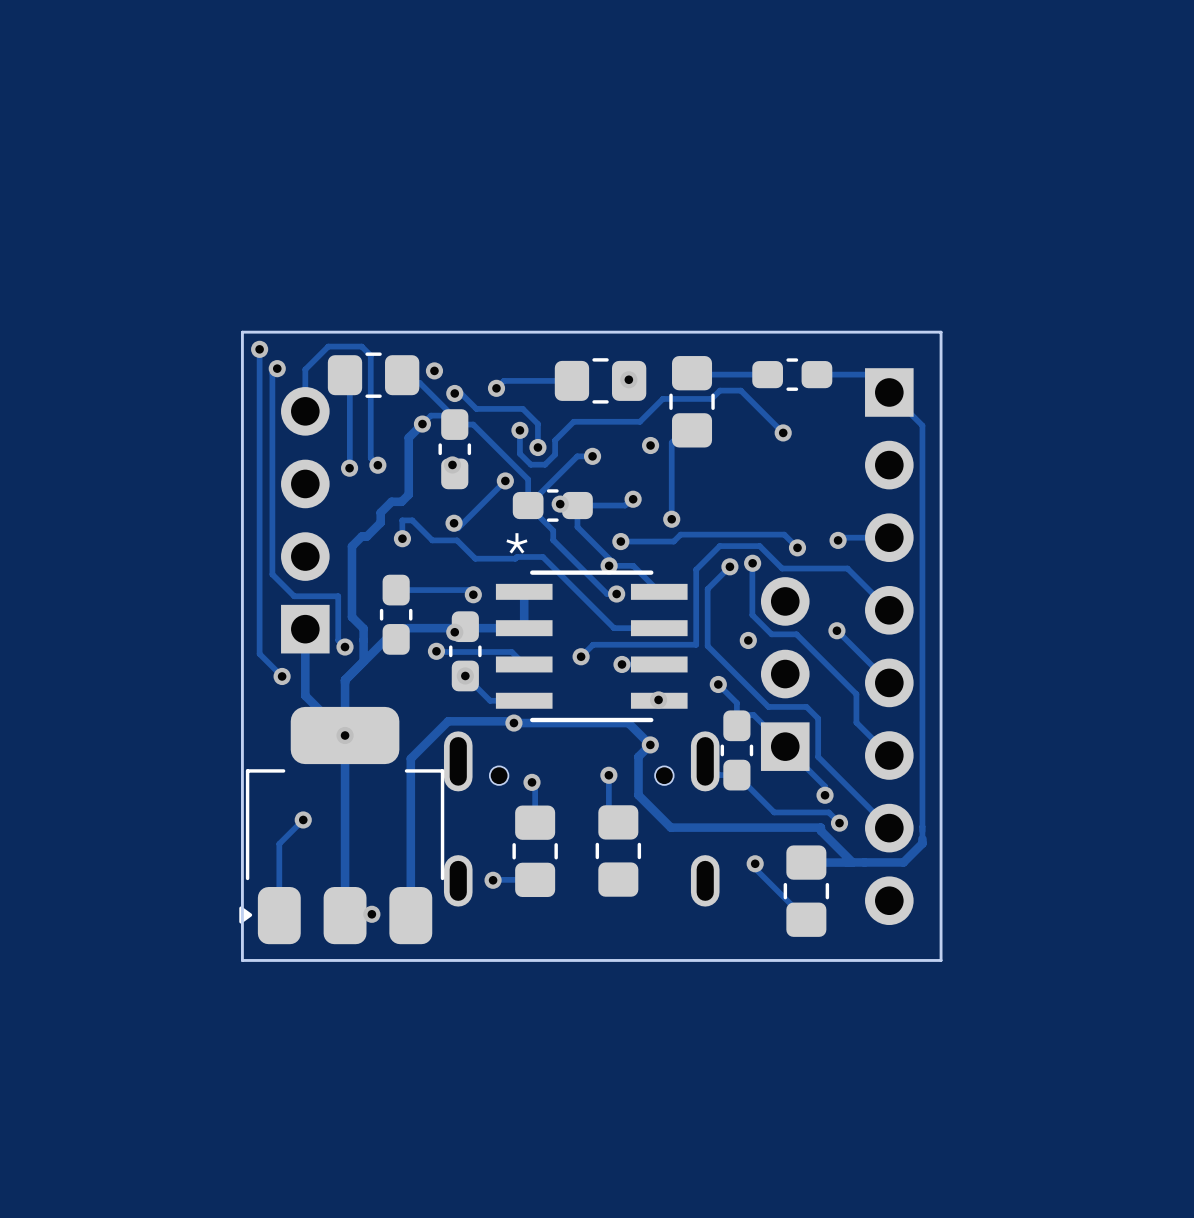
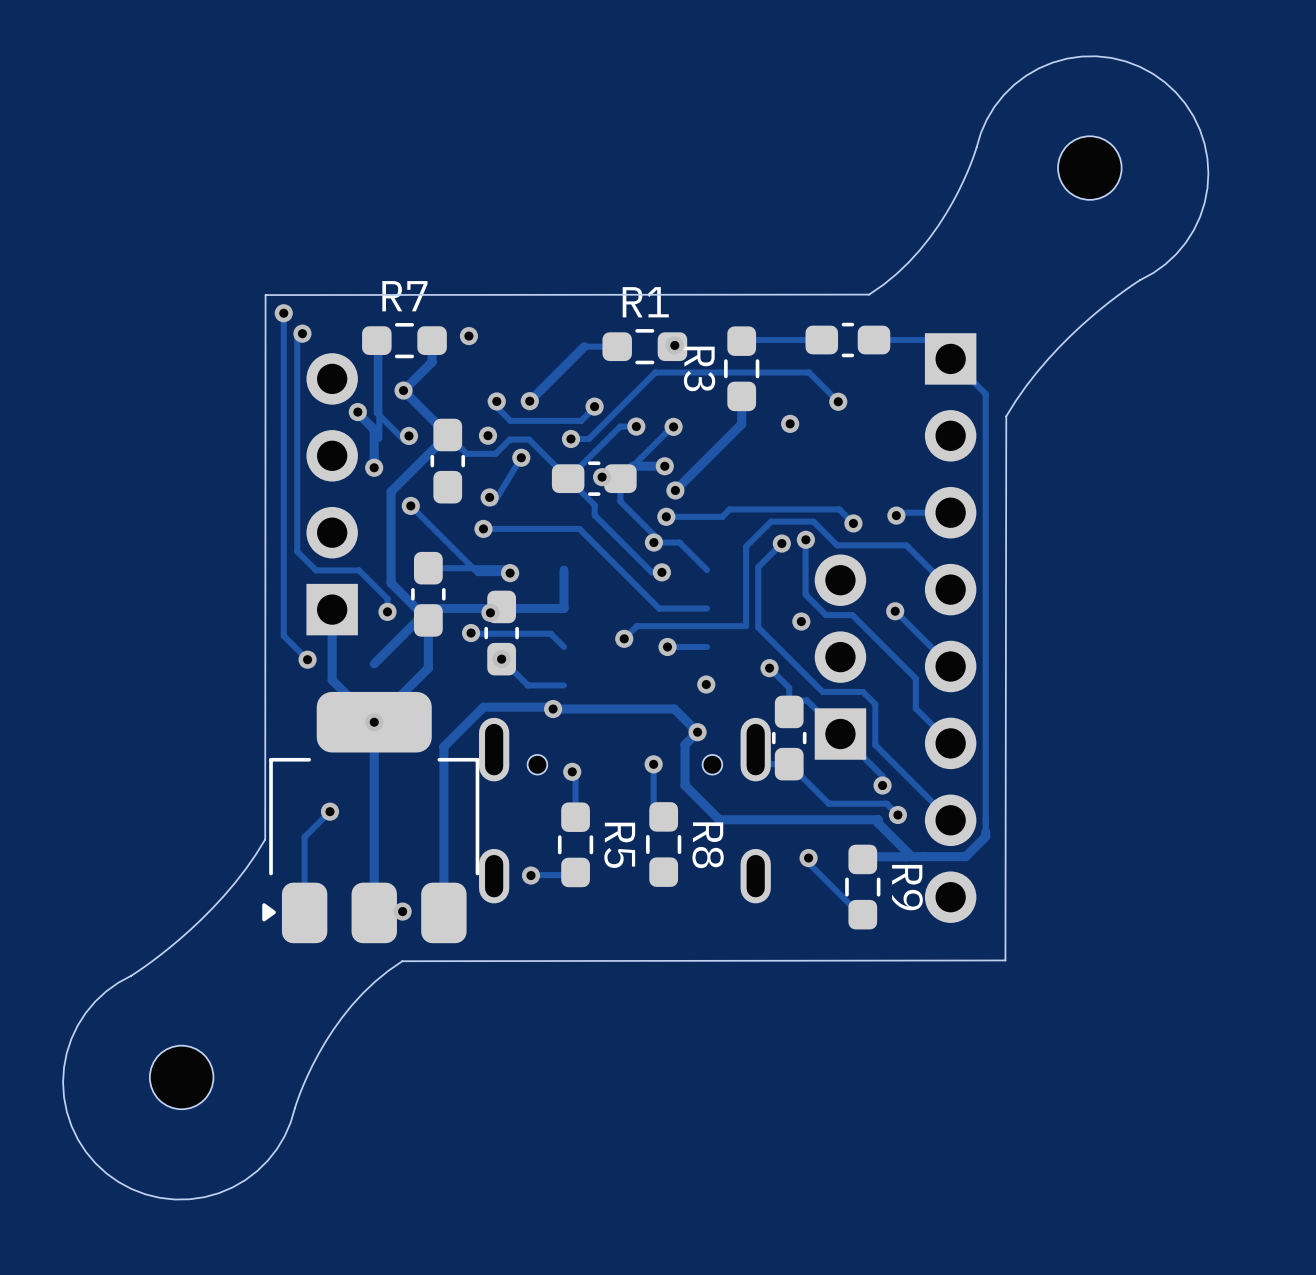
board edge: none -> (976, 147) (958, 191) (929, 238) (896, 274) (869, 294) (265, 295) (265, 839) (234, 883) (201, 919) (152, 960) (106, 991) (95, 1001) (77, 1025) (66, 1053) (63, 1067) (64, 1097) (71, 1126) (77, 1139) (86, 1152) (106, 1173) (131, 1189) (160, 1197) (174, 1199) (204, 1197) (218, 1193) (245, 1180) (267, 1160) (284, 1136) (307, 1074) (333, 1029) (362, 993) (402, 961) (1005, 960) (1006, 416) (1036, 372) (1069, 336) (1118, 294) (1165, 264) (1185, 242) (1200, 216) (1207, 188) (1208, 173) (1207, 158) (1199, 129) (1185, 103) (1175, 92) (1152, 73) (1125, 61) (1111, 57) (1081, 56) (1067, 58) (1052, 62) (1026, 75) (1003, 95) (994, 106) (980, 133) (976, 147)
part: none -> (1089, 168)
board edge: (941, 332) (242, 332) (242, 960) (941, 960) (941, 332) -> none
track: none -> (376, 340) (376, 412) (403, 439)
part: (373, 375) -> none
R7: none -> (404, 340)
track: none -> (432, 340) (432, 362) (403, 390) (447, 434)
track: (402, 375) (409, 382) (419, 382) (454, 417) (454, 424) -> none
track: (543, 380) (503, 380) (496, 388) -> (584, 346) (529, 401)
part: (600, 380) -> none
R1: none -> (644, 346)
via: (496, 388) -> none
track: (454, 393) (461, 393) (476, 408) (522, 408) (537, 424) (537, 447) -> none
via: (454, 393) -> none
part: (692, 401) -> none
R3: none -> (741, 368)
track: (755, 405) (740, 390) (719, 390) (711, 398) (662, 398) (639, 421) (573, 421) (555, 440) (555, 454) (545, 464) (530, 464) (519, 453) (519, 430) (523, 426) -> (809, 372) (655, 372) (588, 439) (570, 439)
track: (305, 411) (305, 369) (328, 346) (361, 346) (370, 355) (370, 458) (377, 465) -> none
via: none -> (403, 390)
via: (422, 424) -> none
track: (454, 424) (473, 424) (528, 479) (528, 505) -> (447, 434) (466, 453) (495, 453) (509, 439) (529, 439) (568, 478)
track: (454, 424) (445, 415) (430, 415) (408, 437) (408, 494) (401, 501) (391, 501) (380, 512) (380, 522) (366, 536) (361, 536) (351, 546) (351, 617) (363, 628) (363, 661) (345, 679) (345, 735) -> (447, 434) (391, 491) (391, 583) (428, 620) (428, 668) (374, 722)
via: (519, 430) -> none
track: (692, 430) (684, 430) (671, 442) (671, 519) -> (741, 399) (741, 424) (675, 490)
track: none -> (496, 401) (490, 400) (510, 420) (581, 420) (594, 406)
via: none -> (496, 401)
via: none -> (529, 401)
track: none -> (357, 412) (374, 429) (374, 467)
via: none -> (357, 412)
via: (650, 445) -> none
via position: (537, 447) -> (594, 406)
part position: (454, 449) -> (447, 461)
via: none -> (790, 423)
track: none -> (673, 426) (672, 426) (620, 478) (632, 466) (664, 466)
via: none -> (673, 426)
via: (349, 468) -> none
via: none -> (570, 439)
track: (505, 480) (458, 528) -> (521, 457) (493, 502)
via: (505, 480) -> none
via: none -> (521, 457)
via: none -> (374, 467)
track: (633, 499) (625, 505) (577, 505) -> none
via position: (633, 499) -> (664, 466)
via: none -> (675, 490)
via: (671, 519) -> none
track: none -> (410, 505) (478, 573) (510, 573)
via: none -> (410, 505)
track: (402, 538) (402, 520) (412, 520) (432, 540) (457, 540) (475, 558) (542, 556) -> (483, 528) (579, 528) (583, 533)
via: (402, 538) -> none
via: none -> (483, 528)
track: (290, 592) (294, 596) (338, 596) (338, 640) (344, 647) -> (316, 570) (359, 570) (387, 598) (387, 611)
part: (591, 646) -> none
via position: (344, 647) -> (387, 611)
part: (618, 850) -> none
R8: none -> (663, 844)
part: (535, 851) -> none
R5: none -> (575, 844)
part: (806, 891) -> none
R9: none -> (862, 887)
part: none -> (181, 1077)

